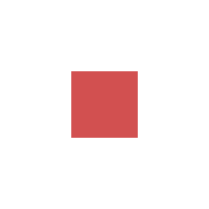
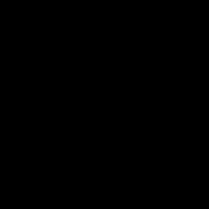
part: (104, 104) -> none

